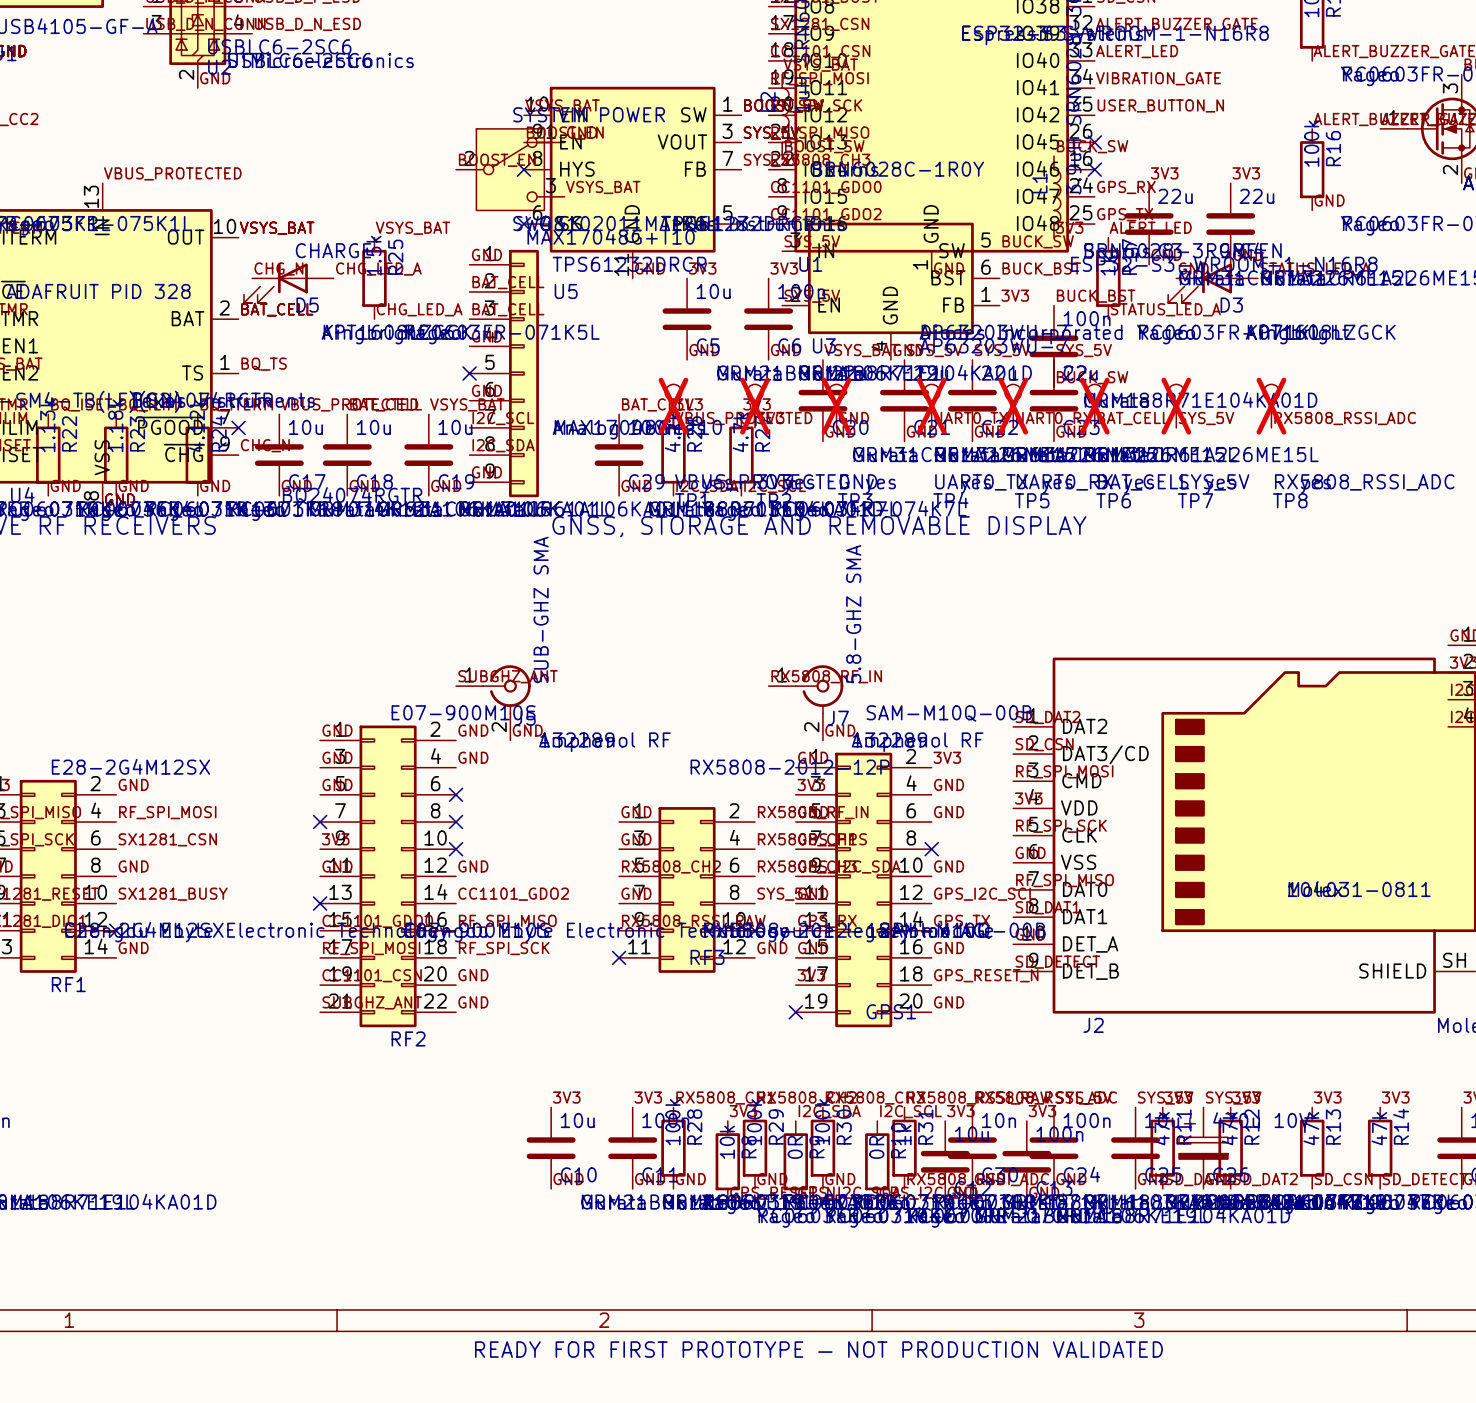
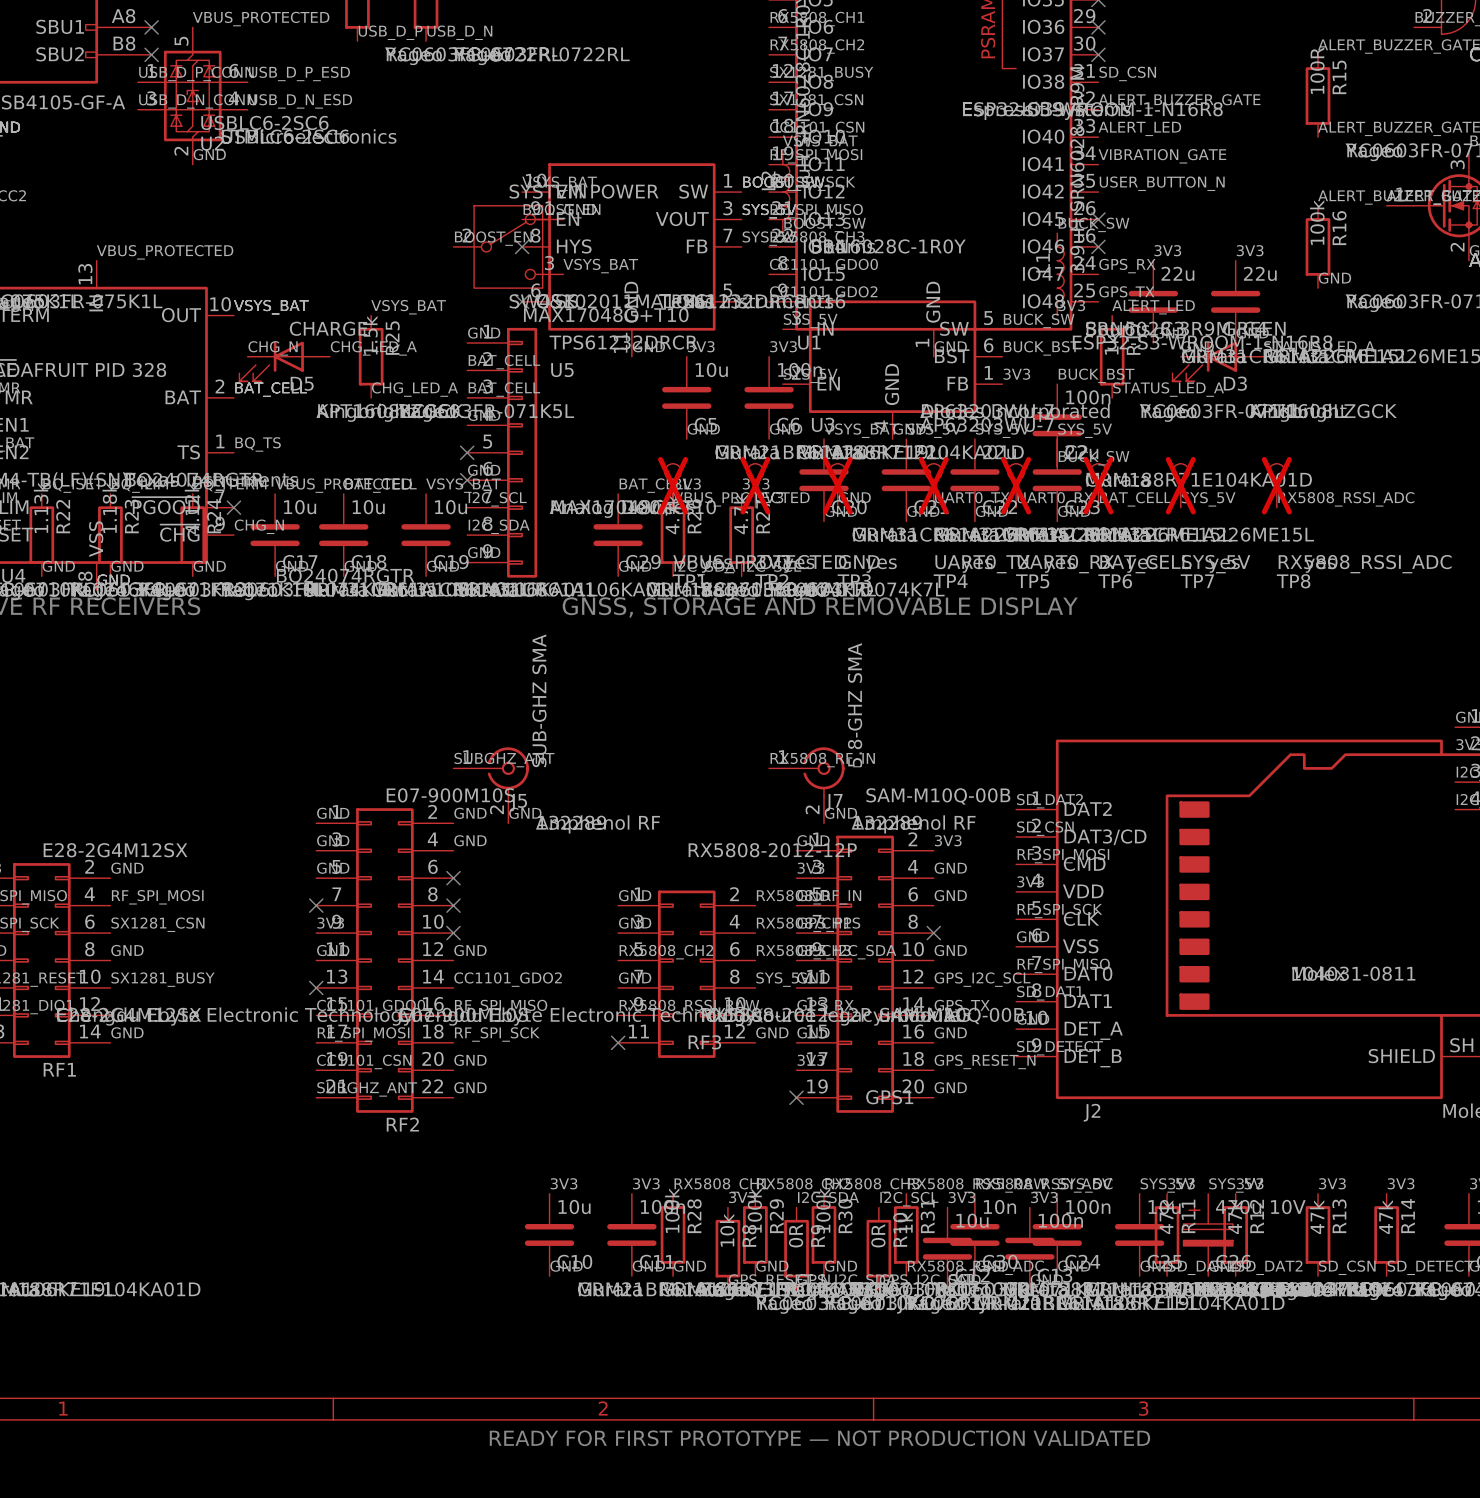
no-connect mark: none -> (467, 480)

